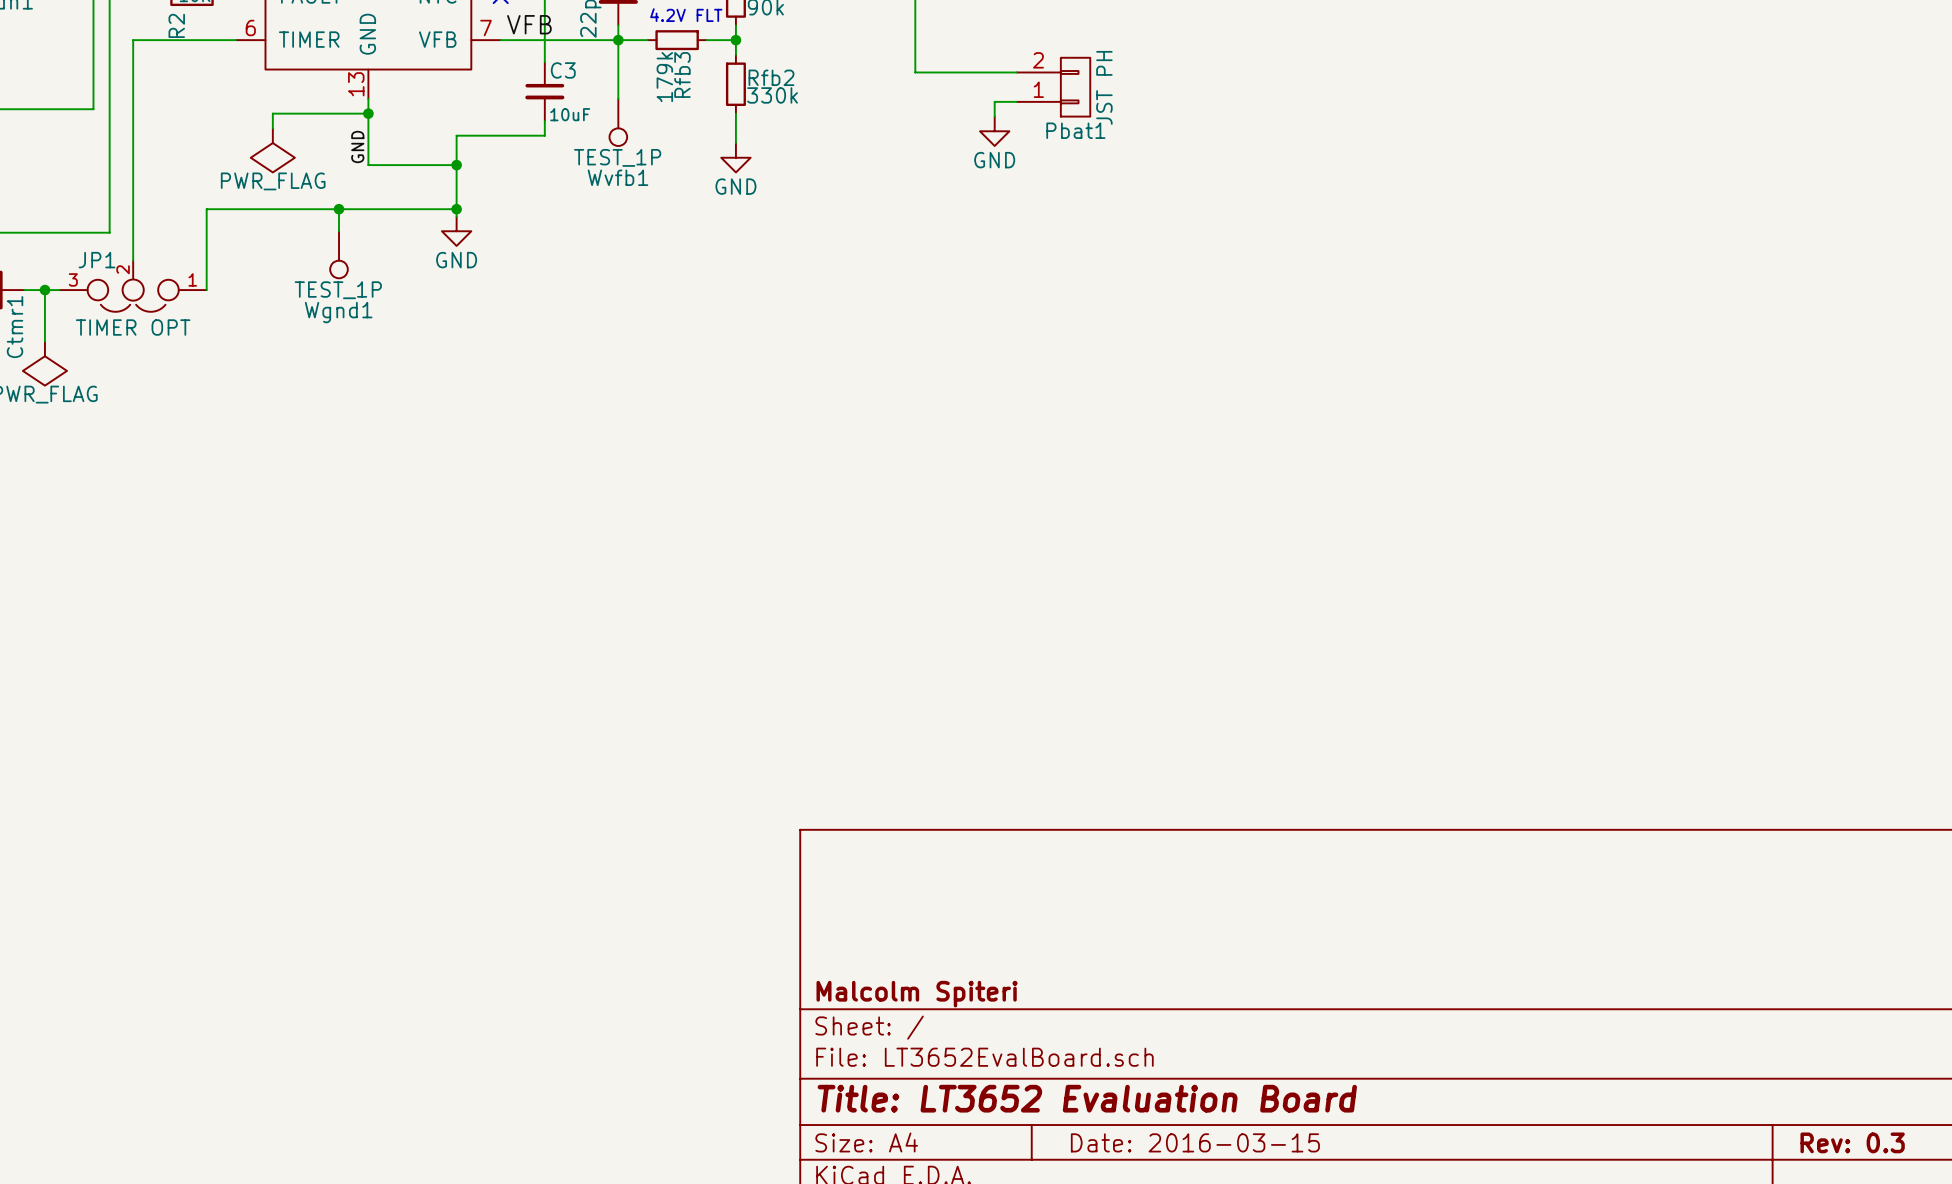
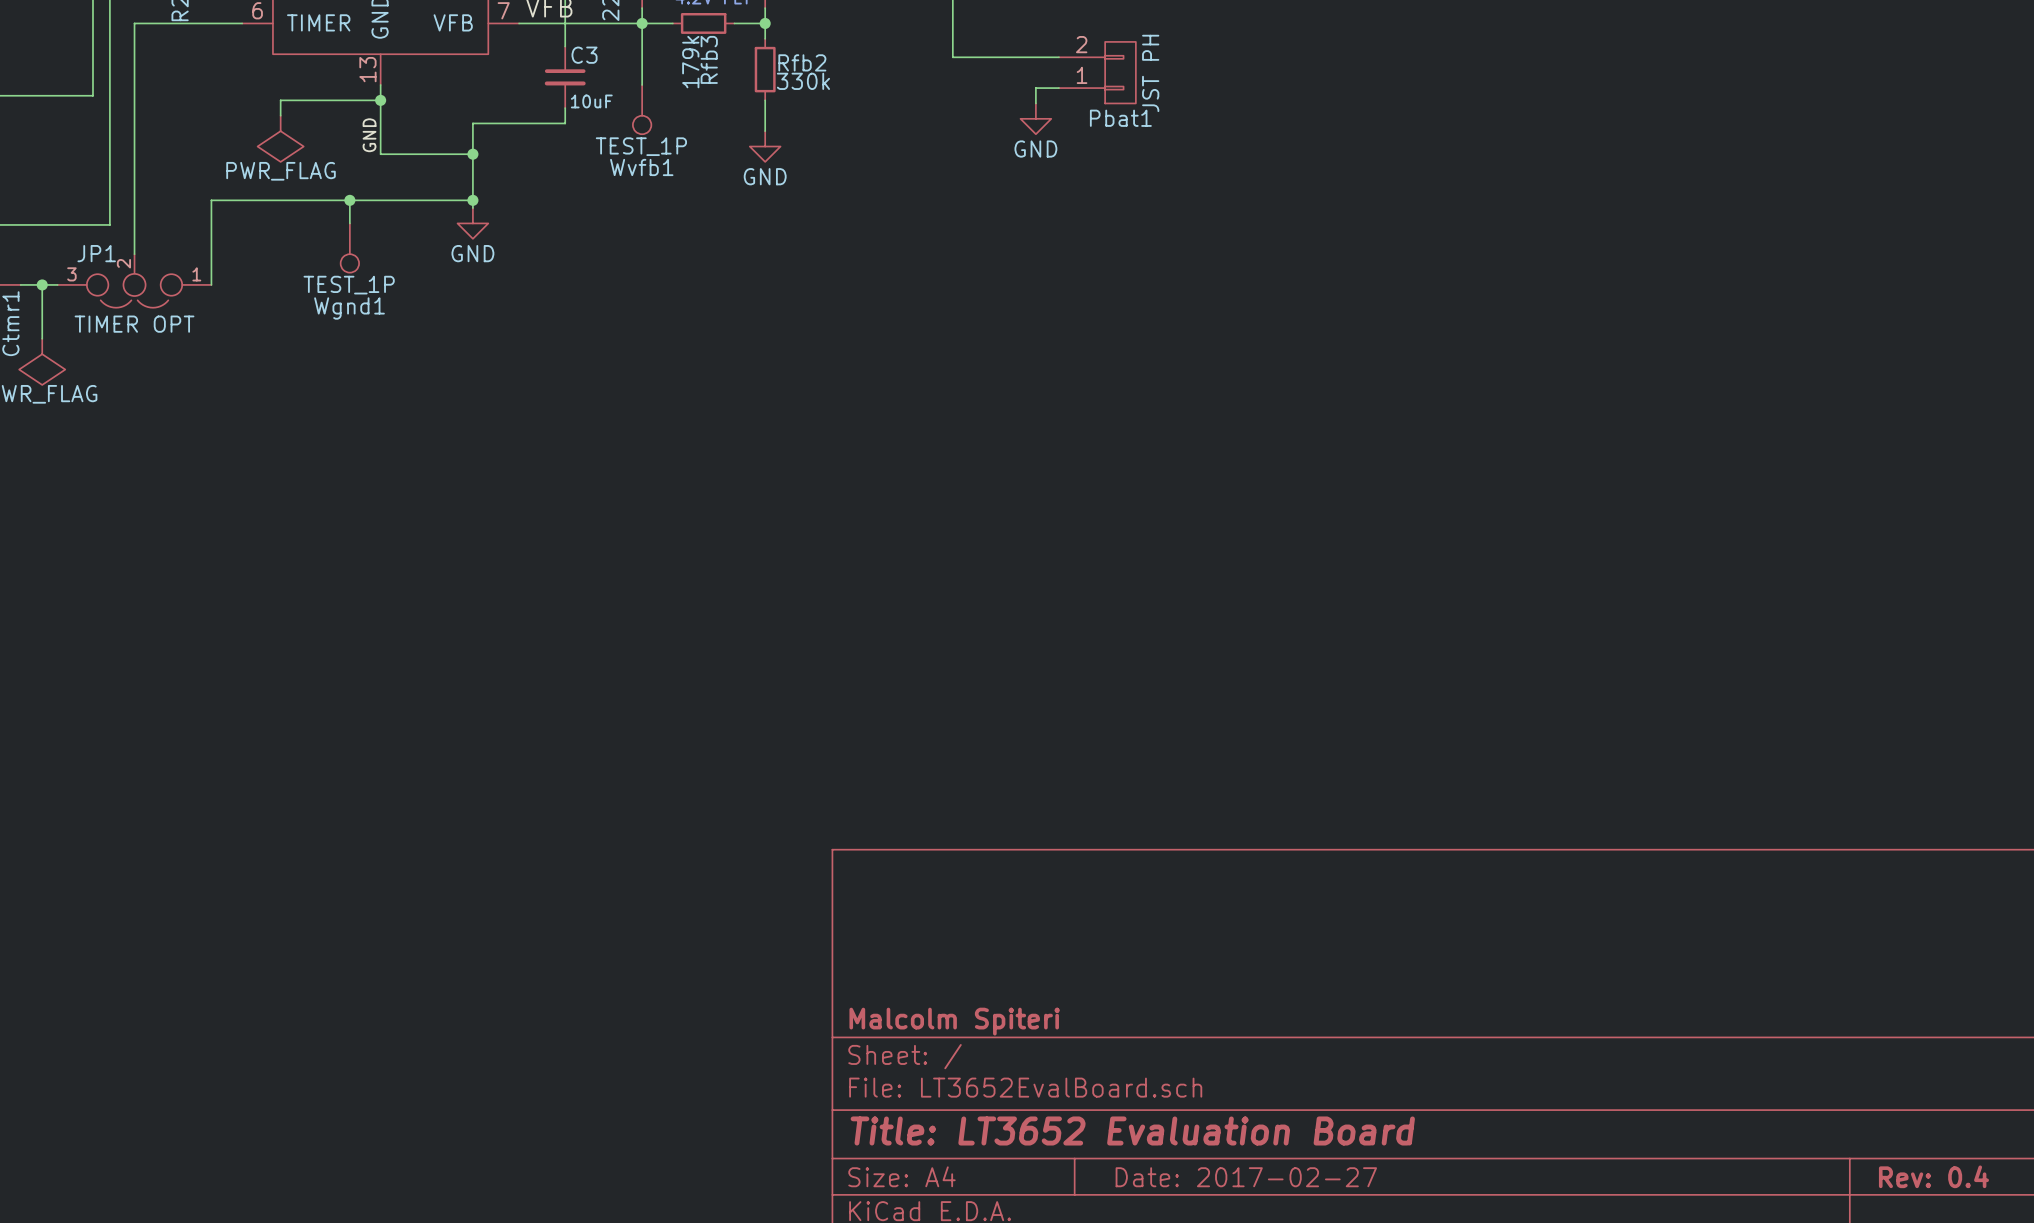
title block: Date: 2016-03-15 (1195, 1142) -> Date: 2017-02-27 (1246, 1177)
title block: Rev: 0.3 (1852, 1142) -> Rev: 0.4 (1933, 1176)

